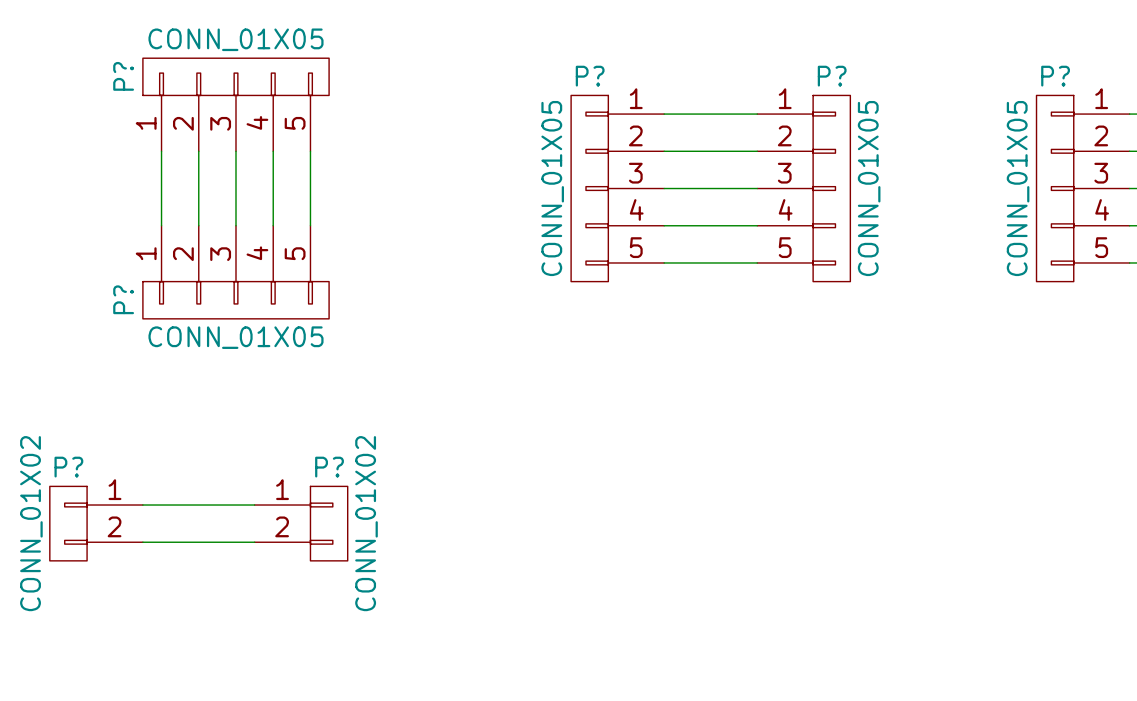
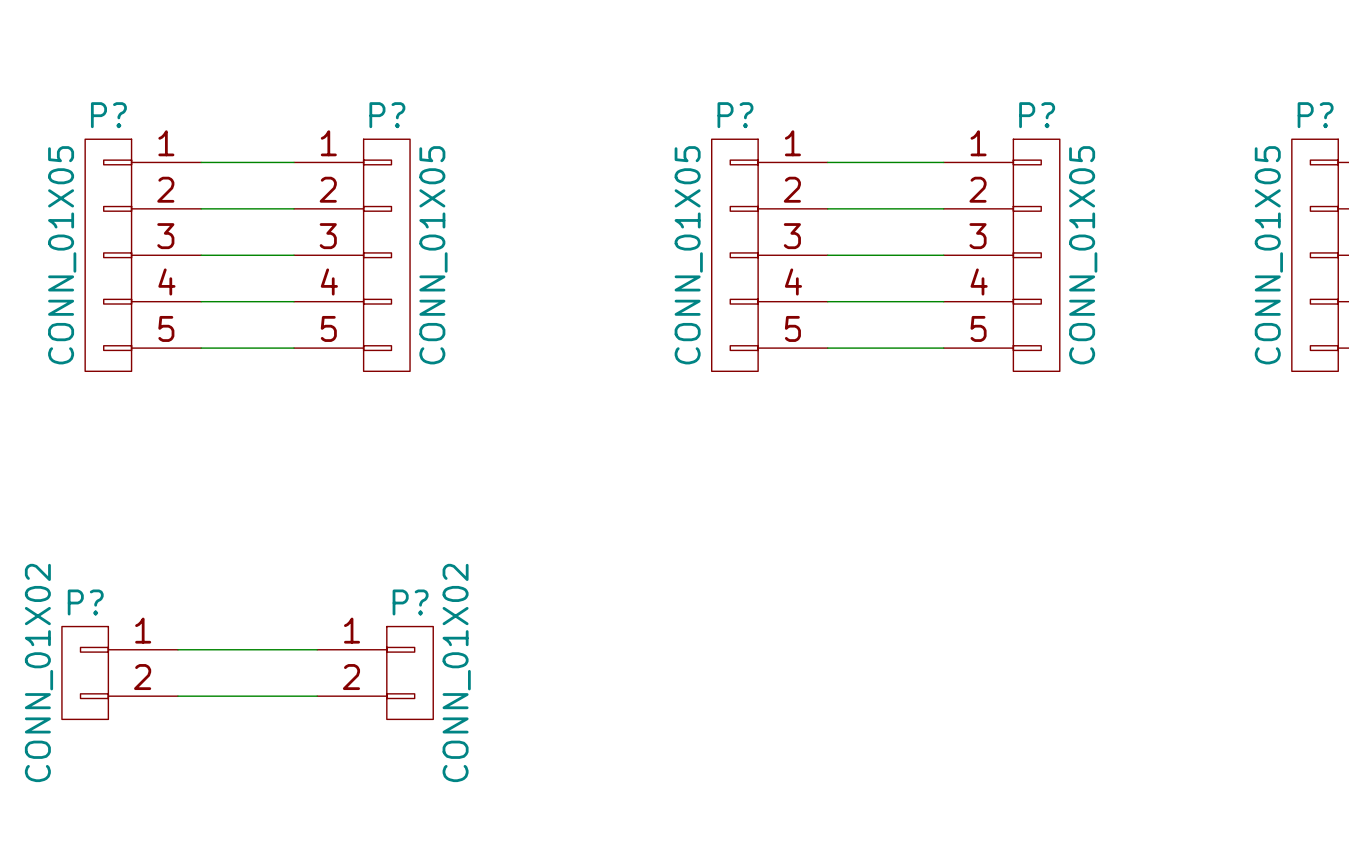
P? rotation: 0° (236, 76) -> 90° clockwise (386, 255)
wire: none -> (201, 162) (294, 162)
wire: (161, 151) (161, 225) -> (201, 208) (294, 208)
wire: (198, 151) (198, 225) -> none
wire: (236, 151) (236, 225) -> (201, 301) (294, 301)
wire: (273, 151) (273, 225) -> none
wire: (310, 151) (310, 225) -> none
wire: none -> (201, 255) (294, 255)
wire: none -> (201, 348) (294, 348)
P? position: (236, 272) -> (143, 255)
P? rotation: 0° (236, 300) -> 90° clockwise (108, 255)

